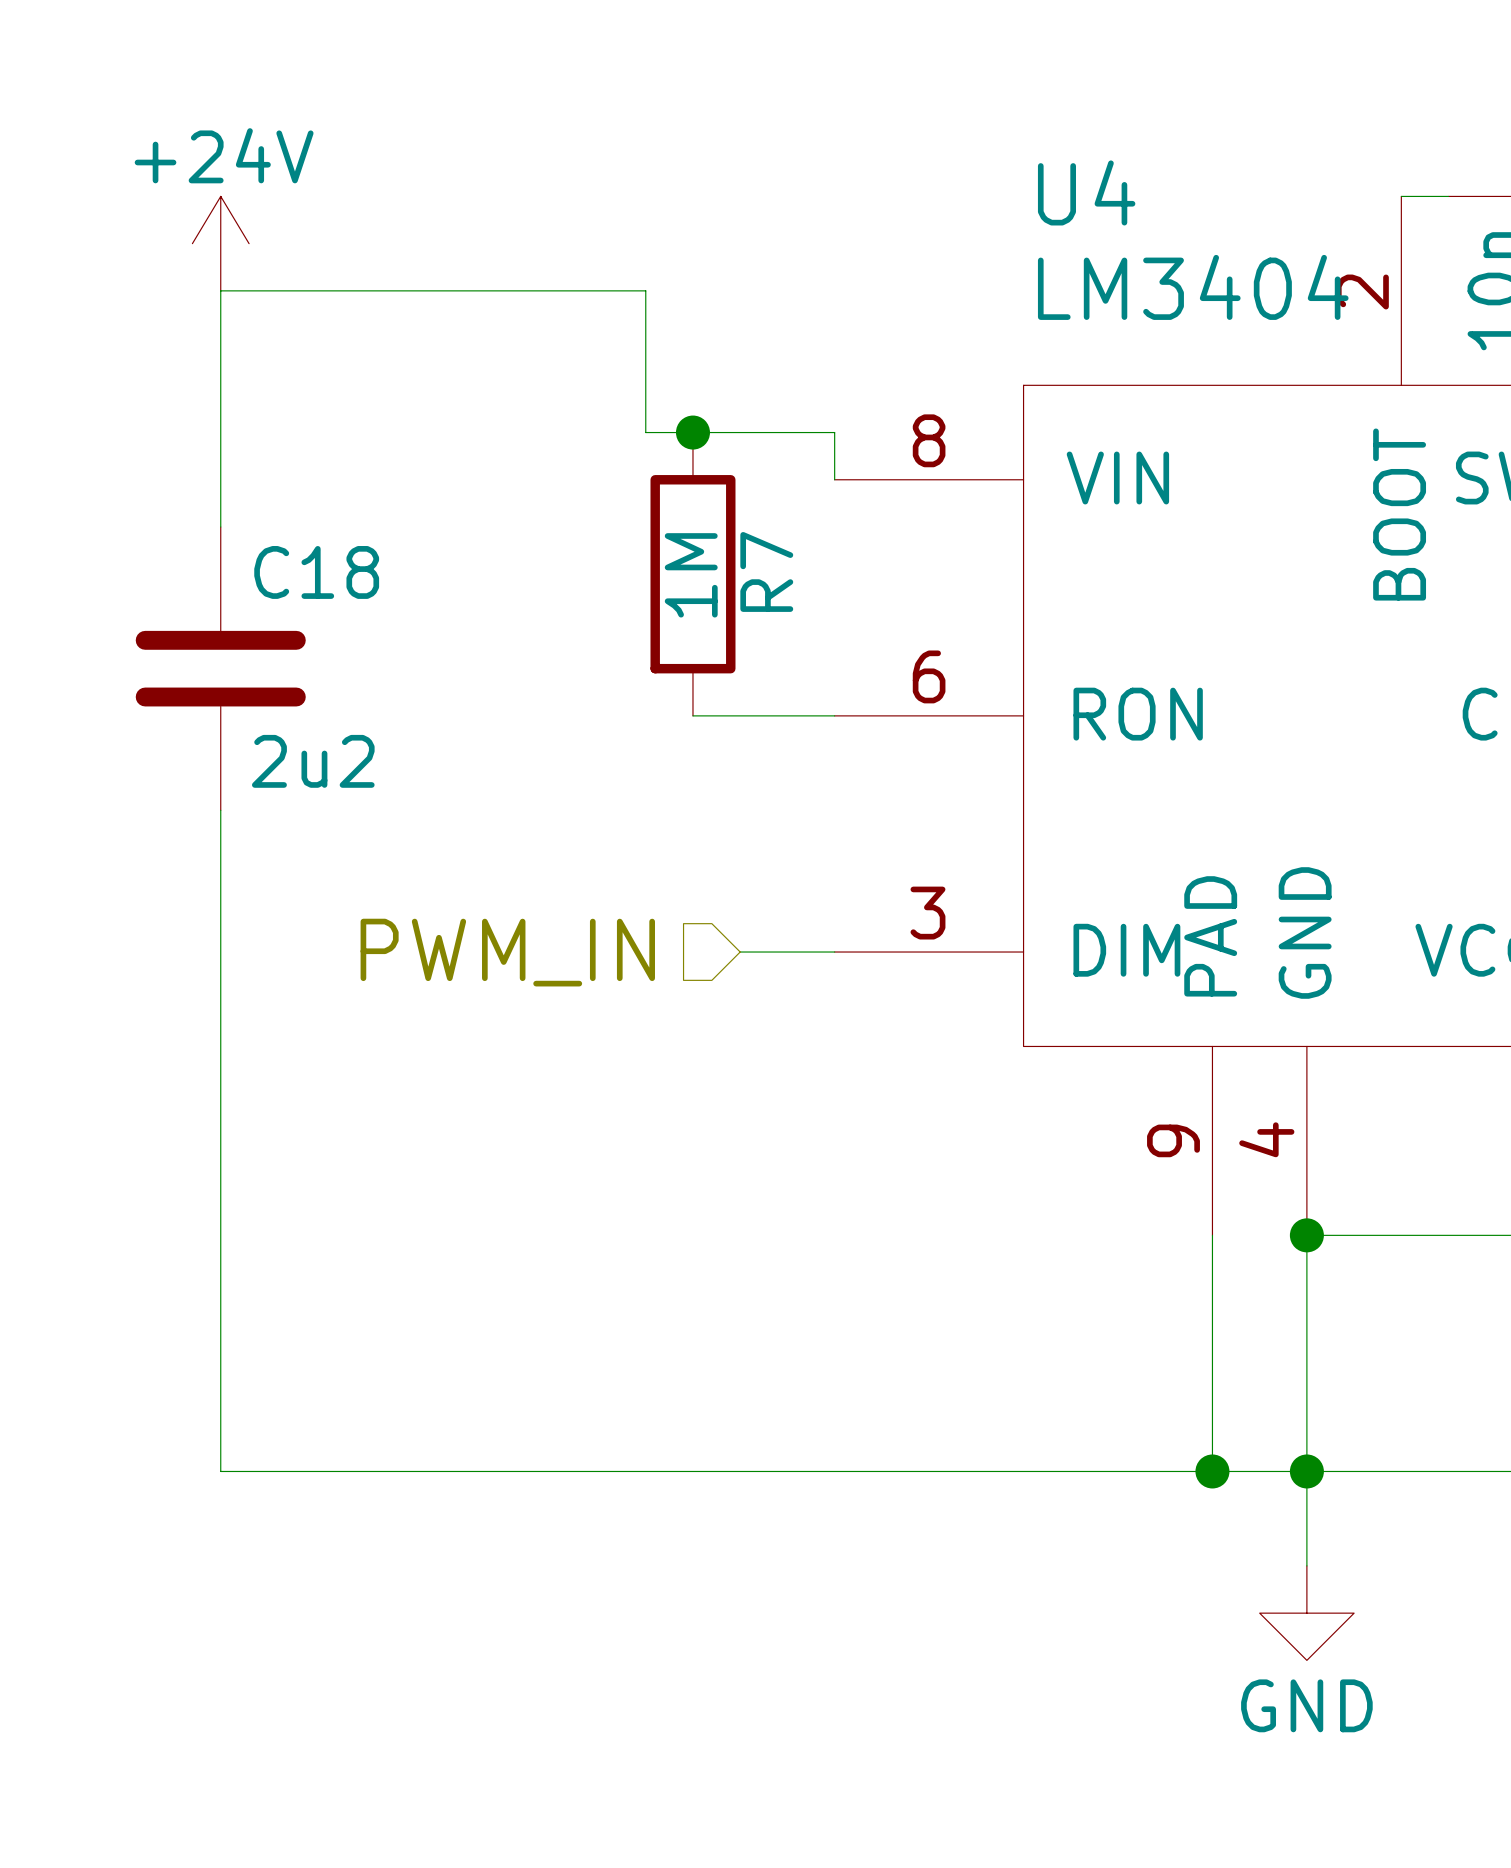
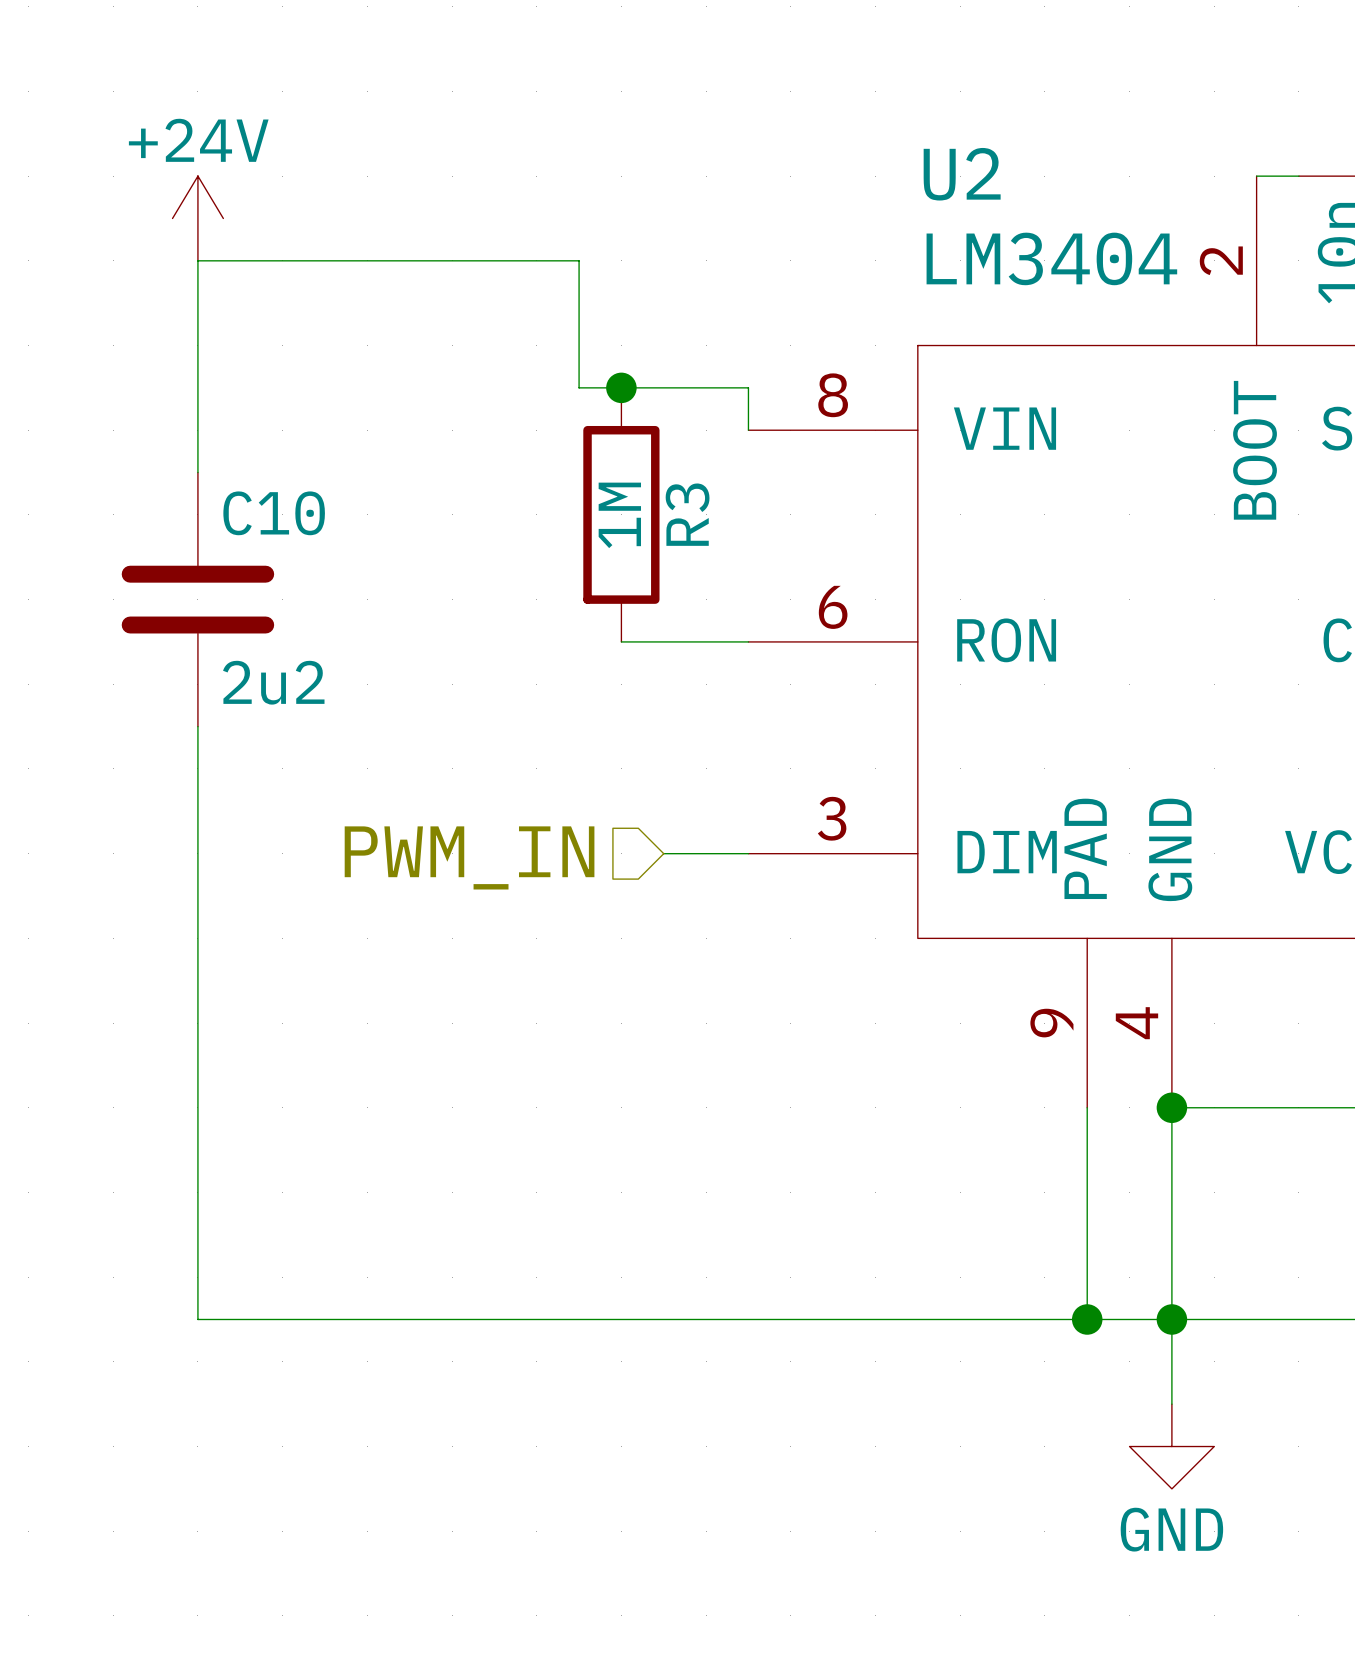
U4 name: U4 (1086, 192) -> U2 (962, 174)
R7 name: R7 (766, 571) -> R3 (687, 514)
C18 name: C18 (316, 572) -> C10 (274, 513)

